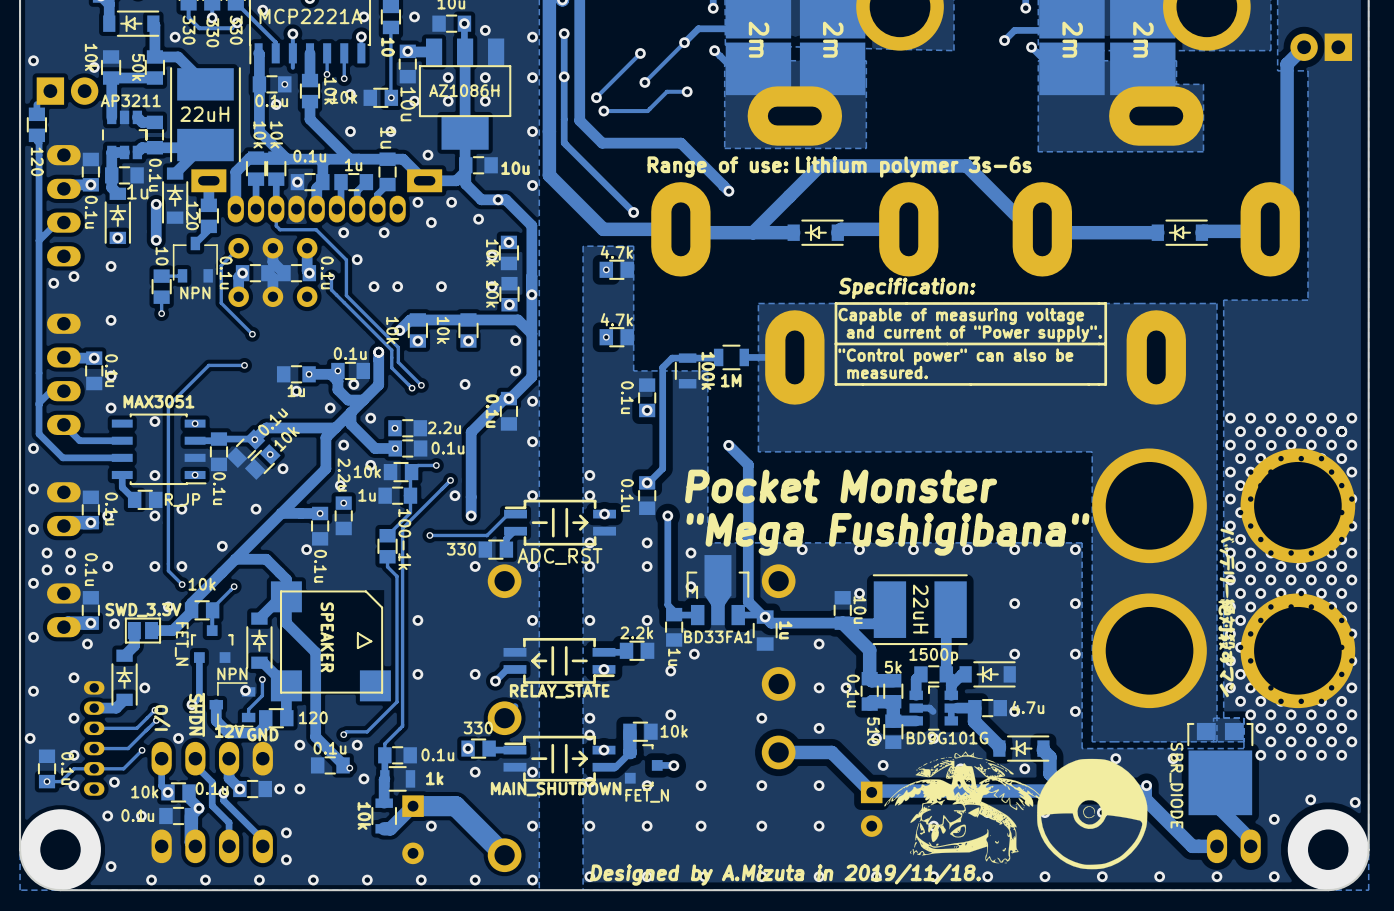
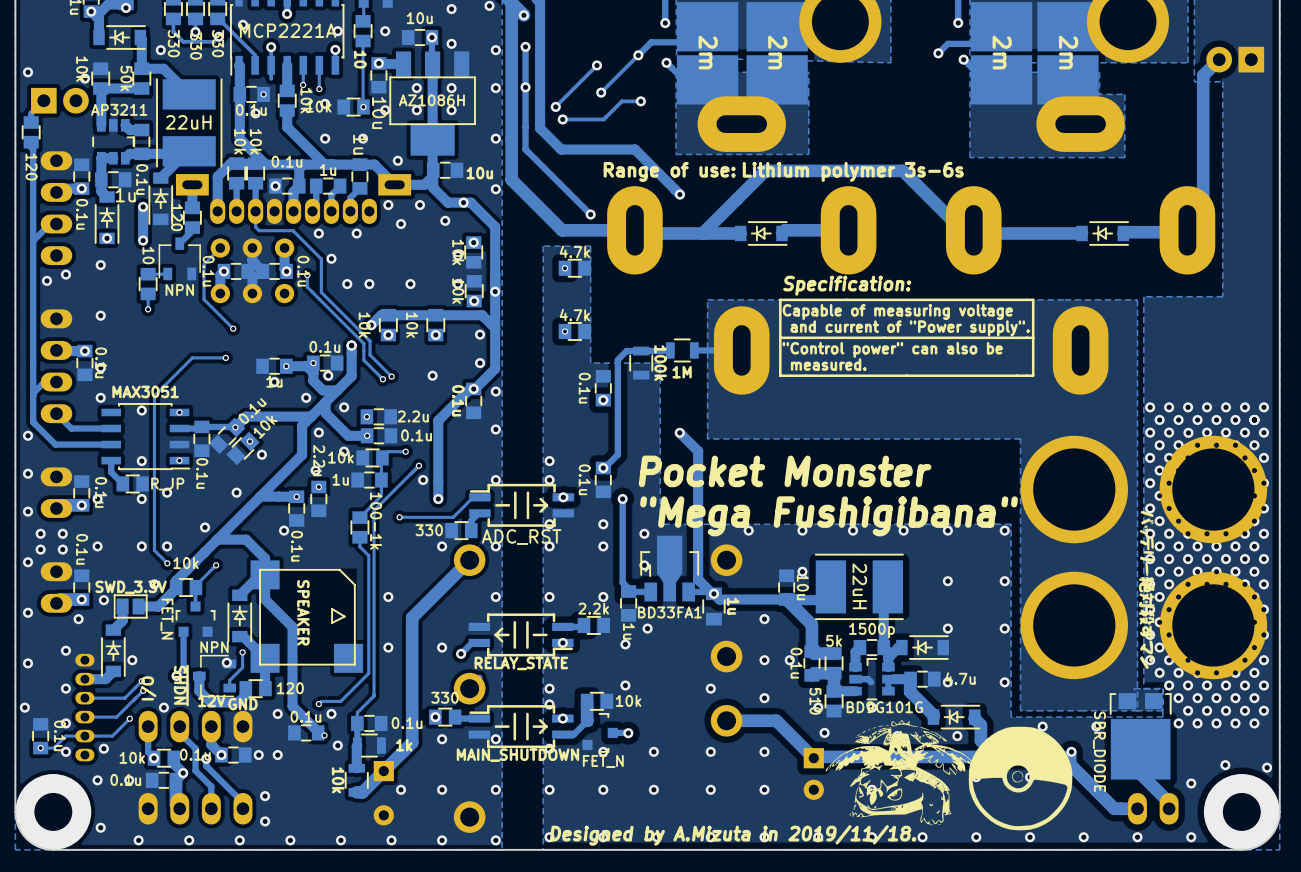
track: (413, 806) (455, 806) (504, 855) -> (383, 771) (412, 742) (412, 617) (469, 560)
via: none -> (442, 789)

